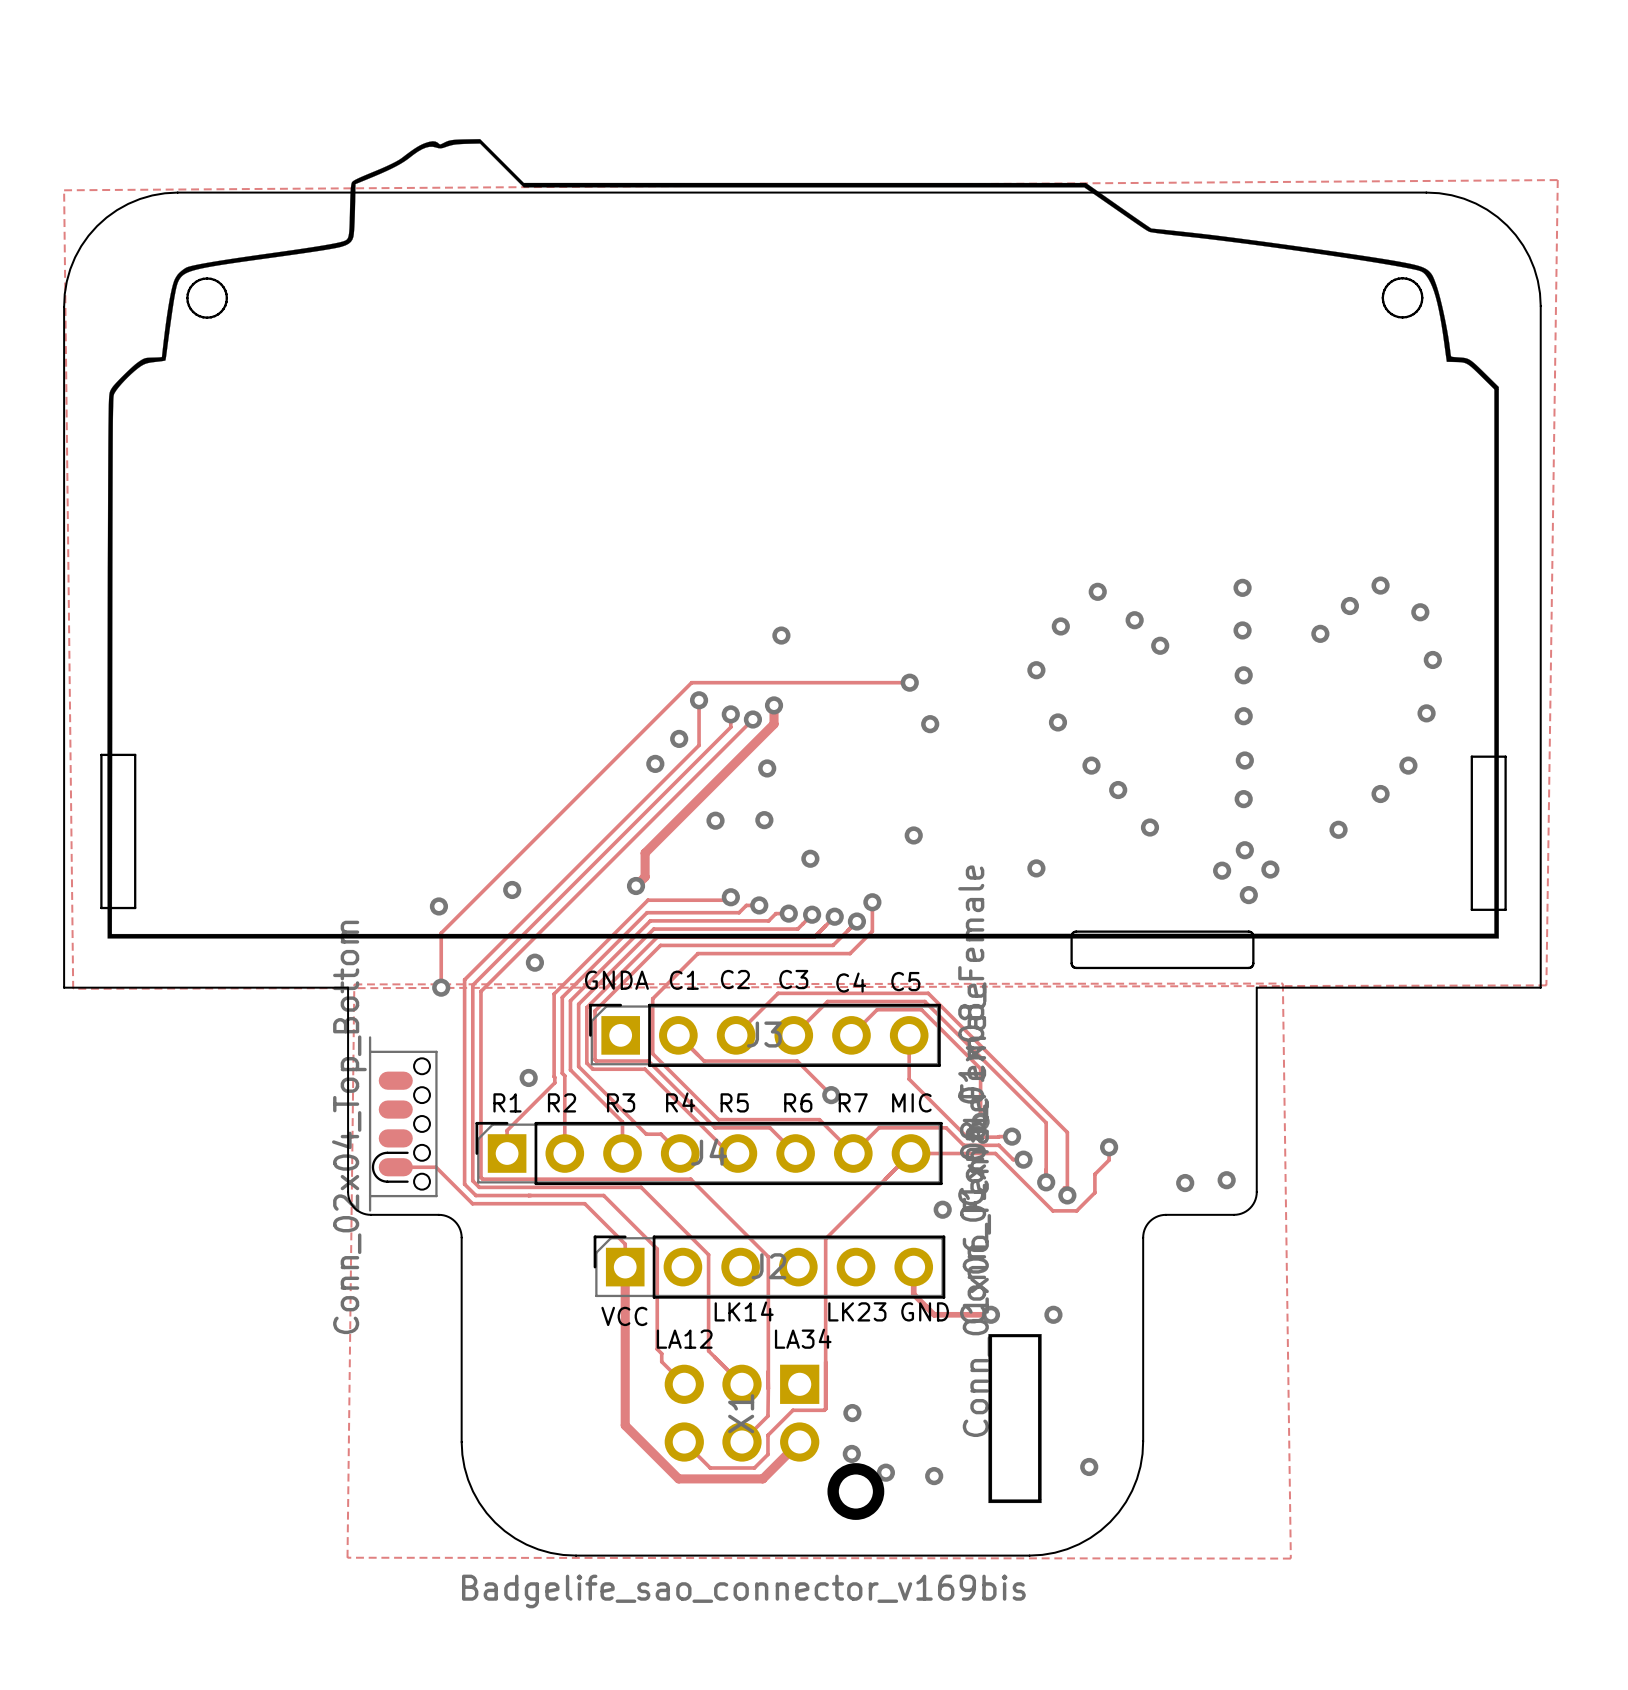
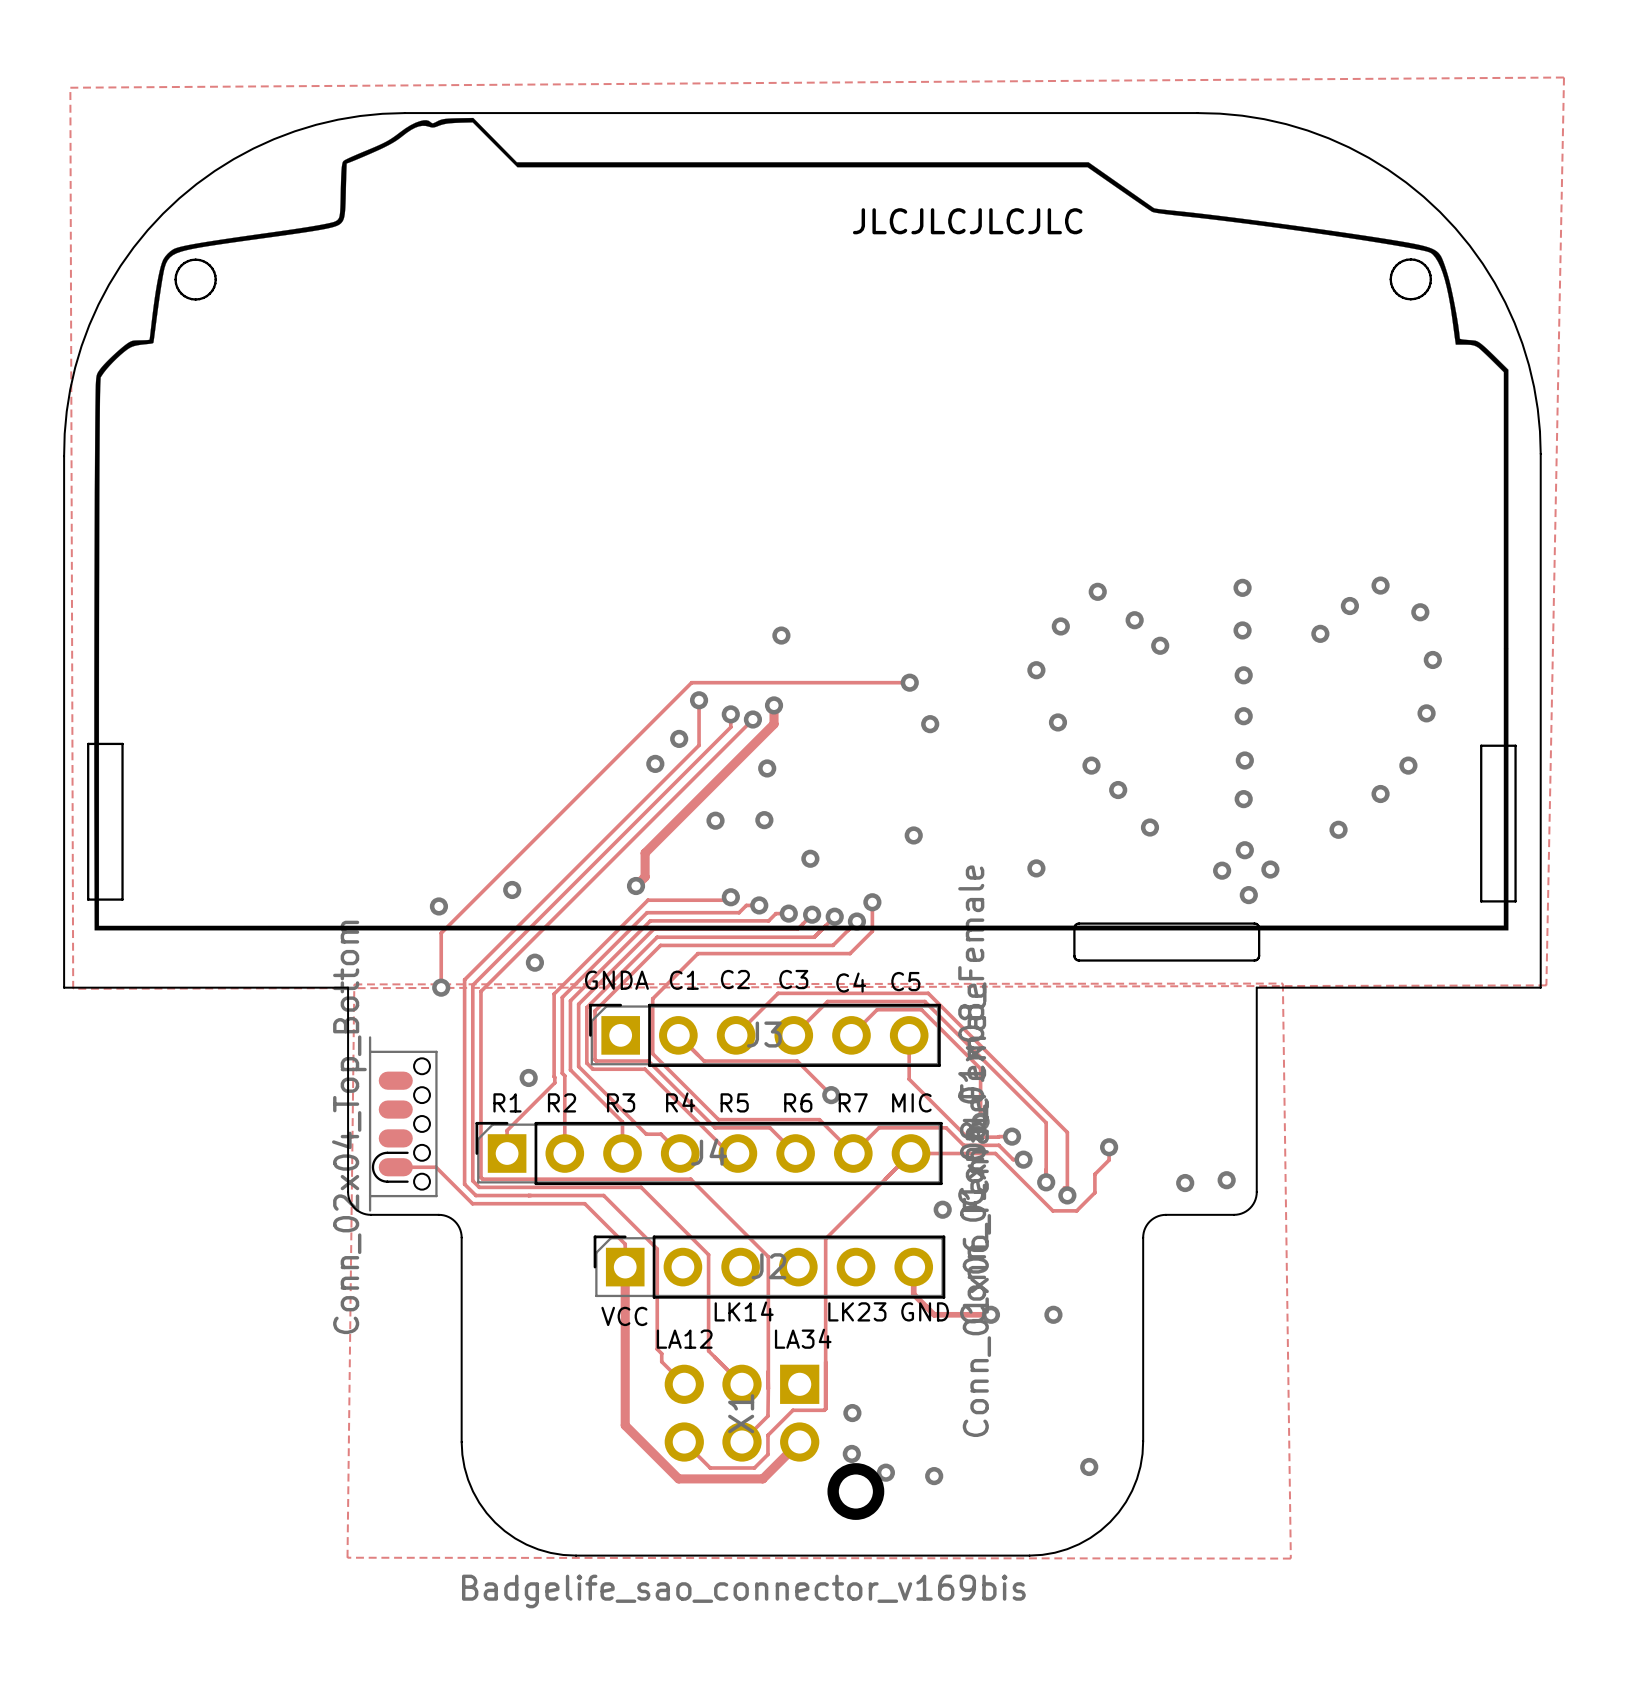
drawing: none -> [87, 117, 1517, 962]
drawing: [100, 139, 1507, 1504] -> none
text: none -> JLCJLCJLCJLC (967, 221)
board edge: (1540, 453) (1540, 306) (1534, 268) (1515, 235) (1497, 217) (1475, 203) (1451, 195) (1426, 192) (177, 192) (140, 199) (117, 210) (88, 235) (75, 257) (64, 294) (64, 456) -> (1540, 453) (1534, 387) (1522, 343) (1505, 302) (1482, 263) (1440, 212) (1406, 182) (1368, 157) (1307, 130) (1264, 119) (1197, 113) (404, 113) (338, 119) (273, 139) (214, 170) (163, 213) (120, 265) (89, 325) (70, 389) (64, 456)
zone outline: (1546, 985) (1557, 180) (64, 190) (73, 988) -> (1546, 985) (1564, 77) (70, 87) (73, 988)

